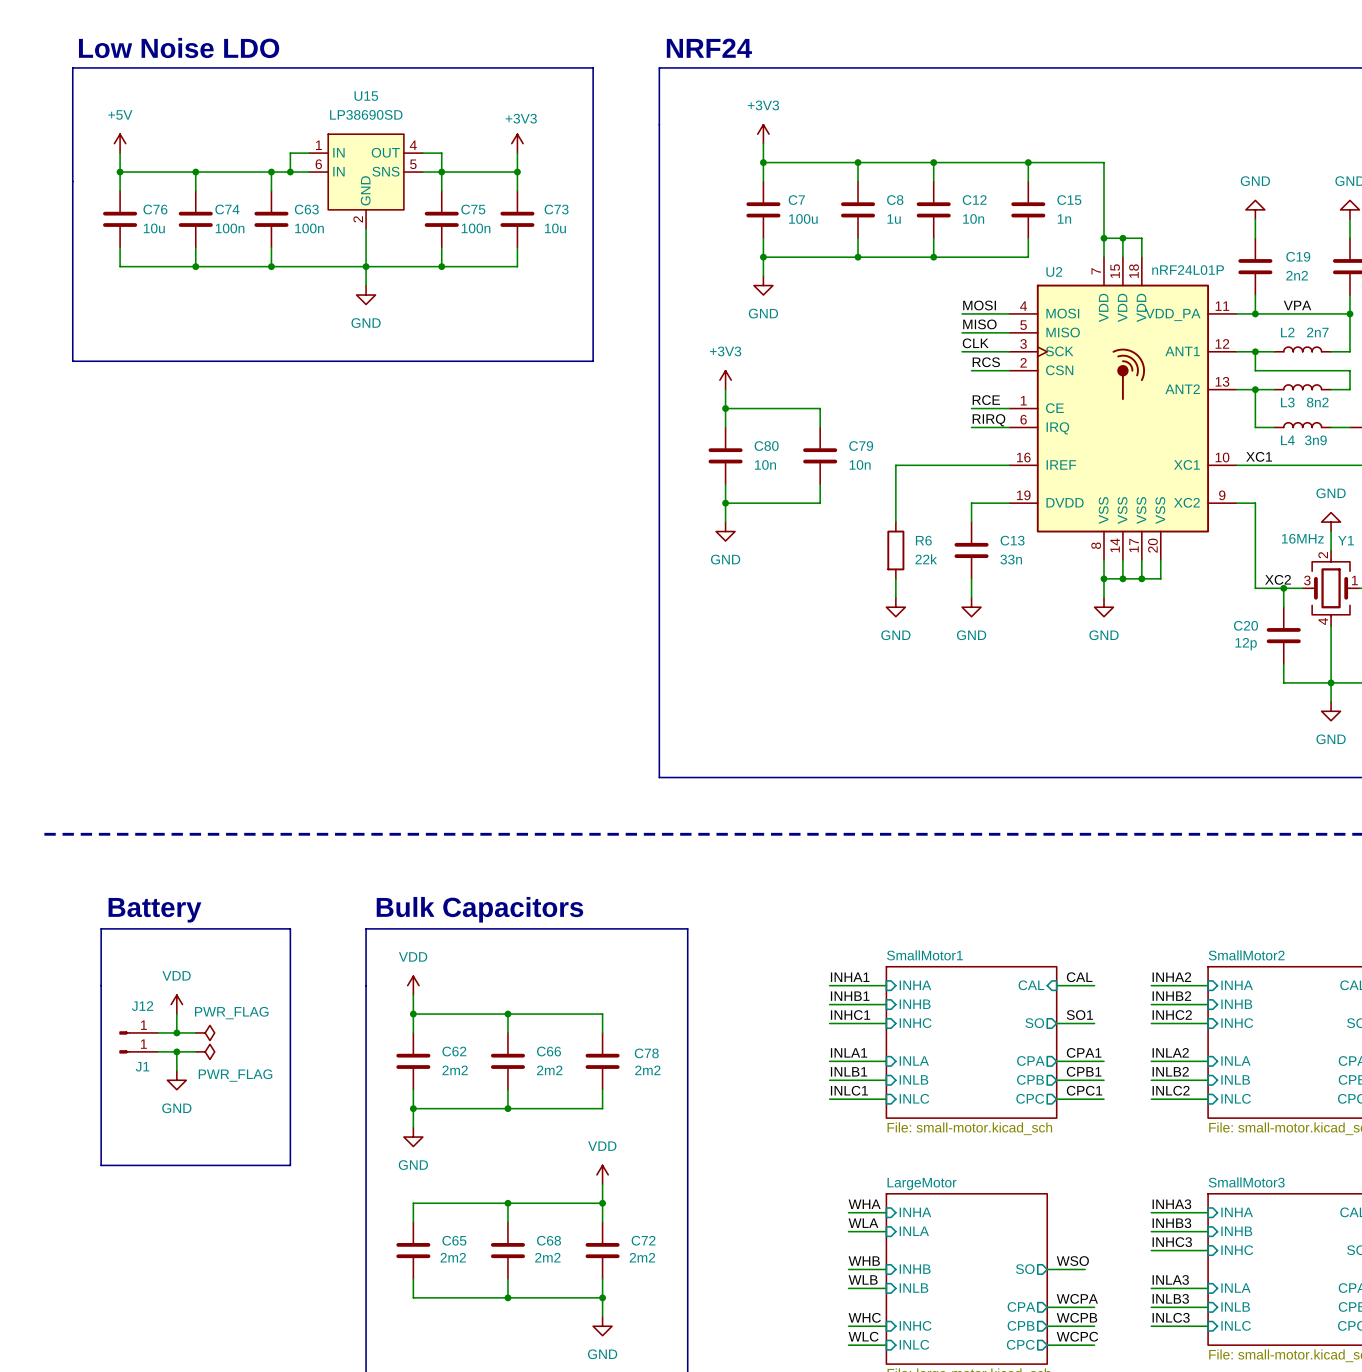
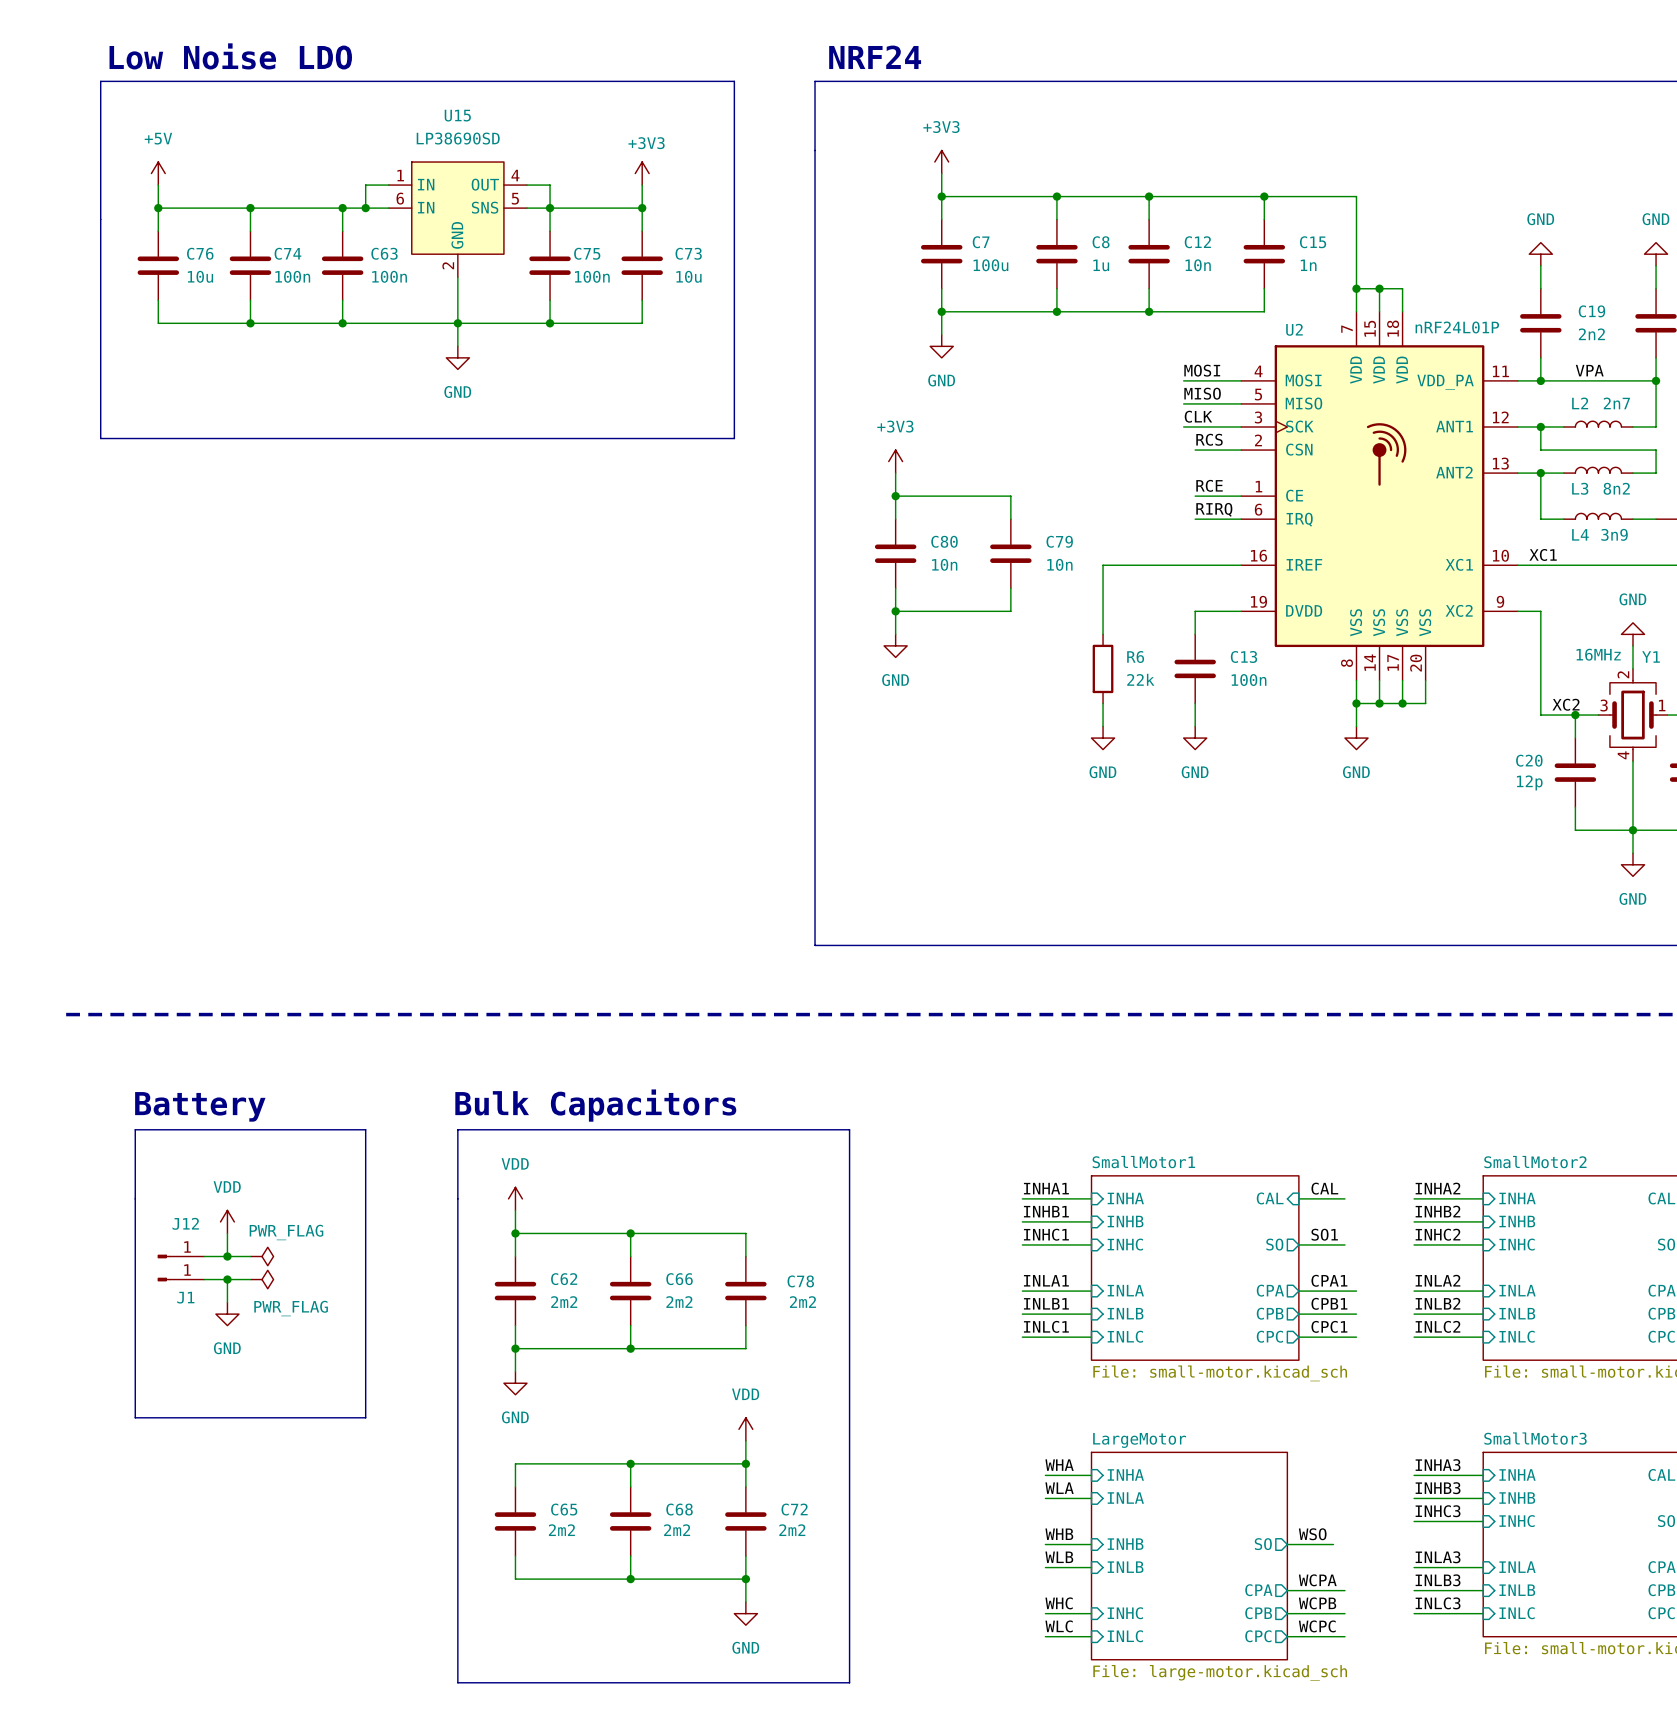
C13 value: 33n (1011, 559) -> 100n (1249, 680)

